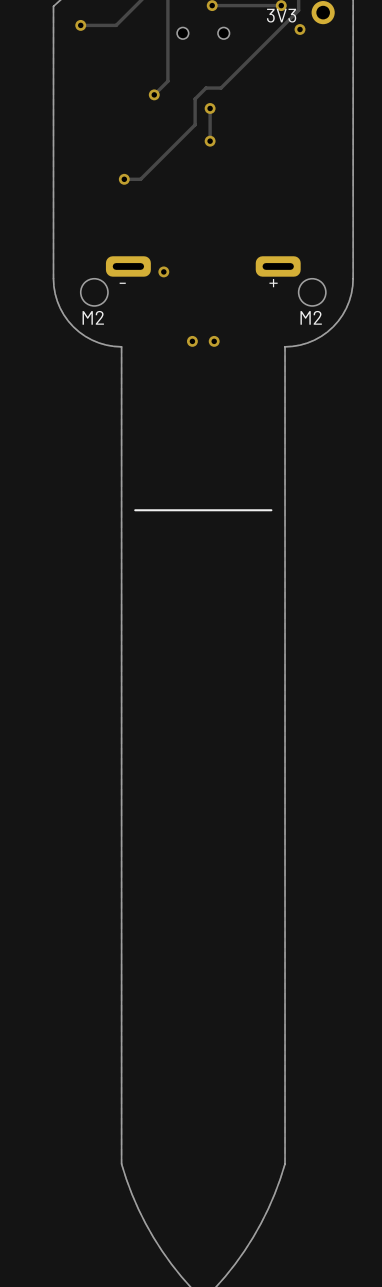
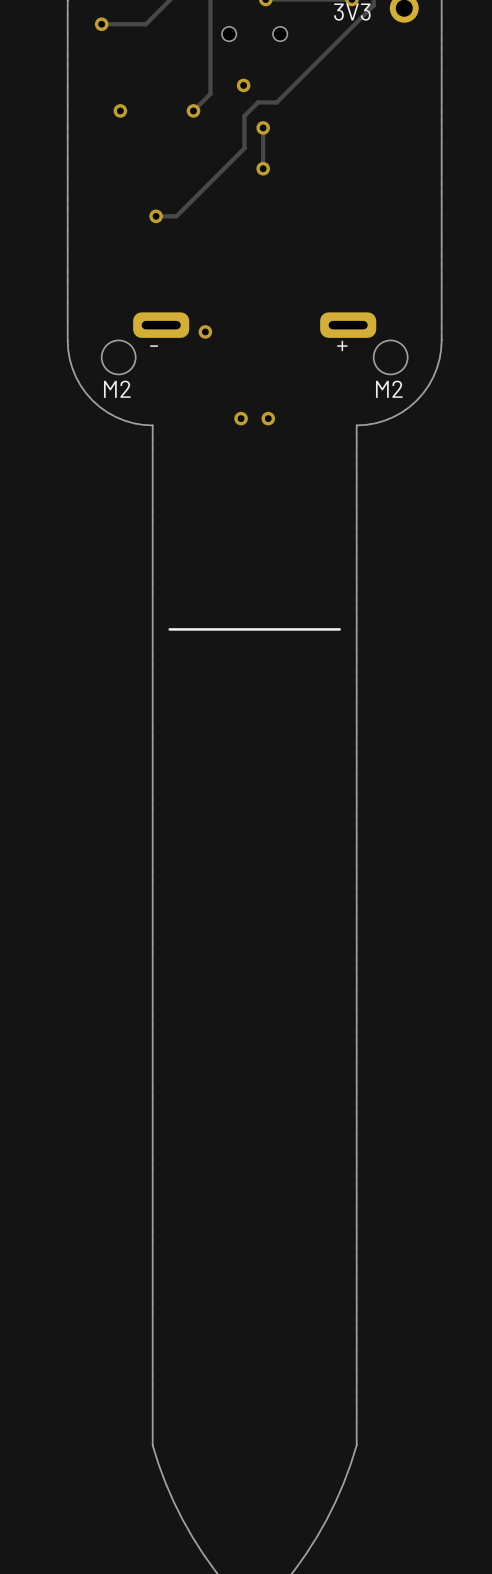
via: (300, 29) -> none
via: none -> (243, 85)
via: none -> (120, 110)

